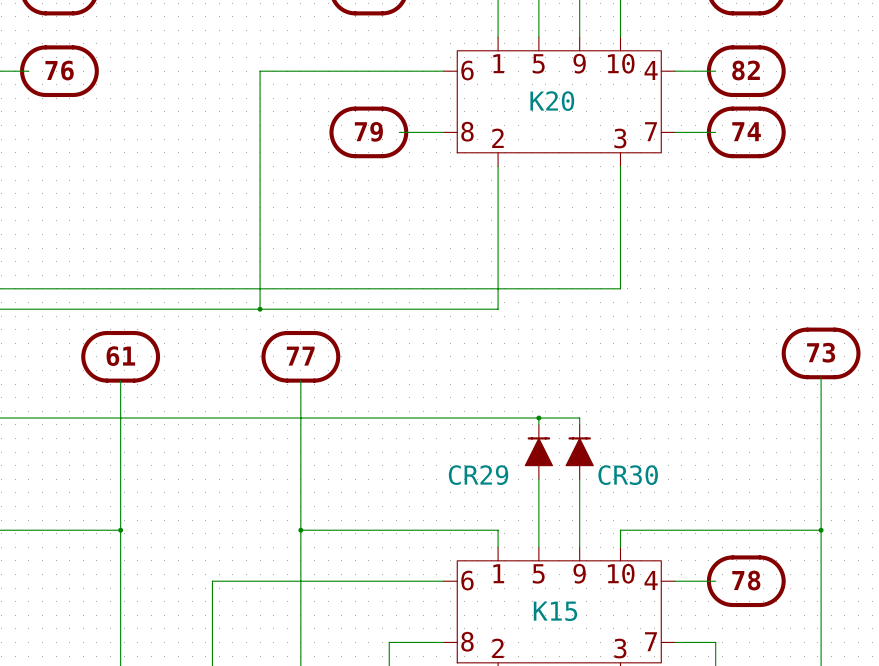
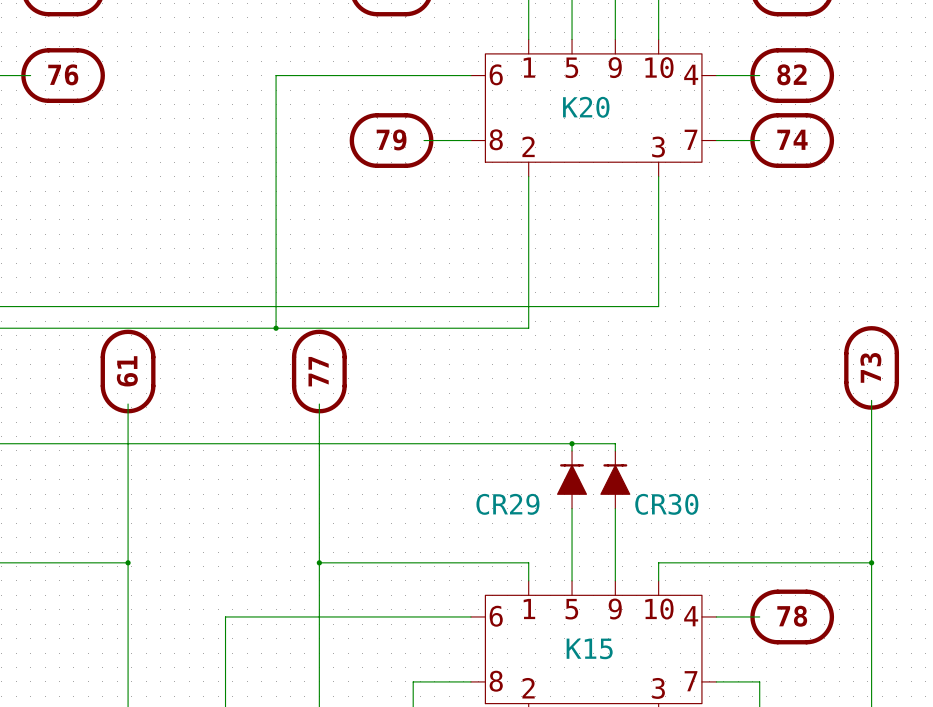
part rotation: 0° (821, 353) -> 90° clockwise (871, 367)
part rotation: 0° (120, 356) -> 90° clockwise (128, 371)
part rotation: 0° (300, 356) -> 90° clockwise (319, 371)

